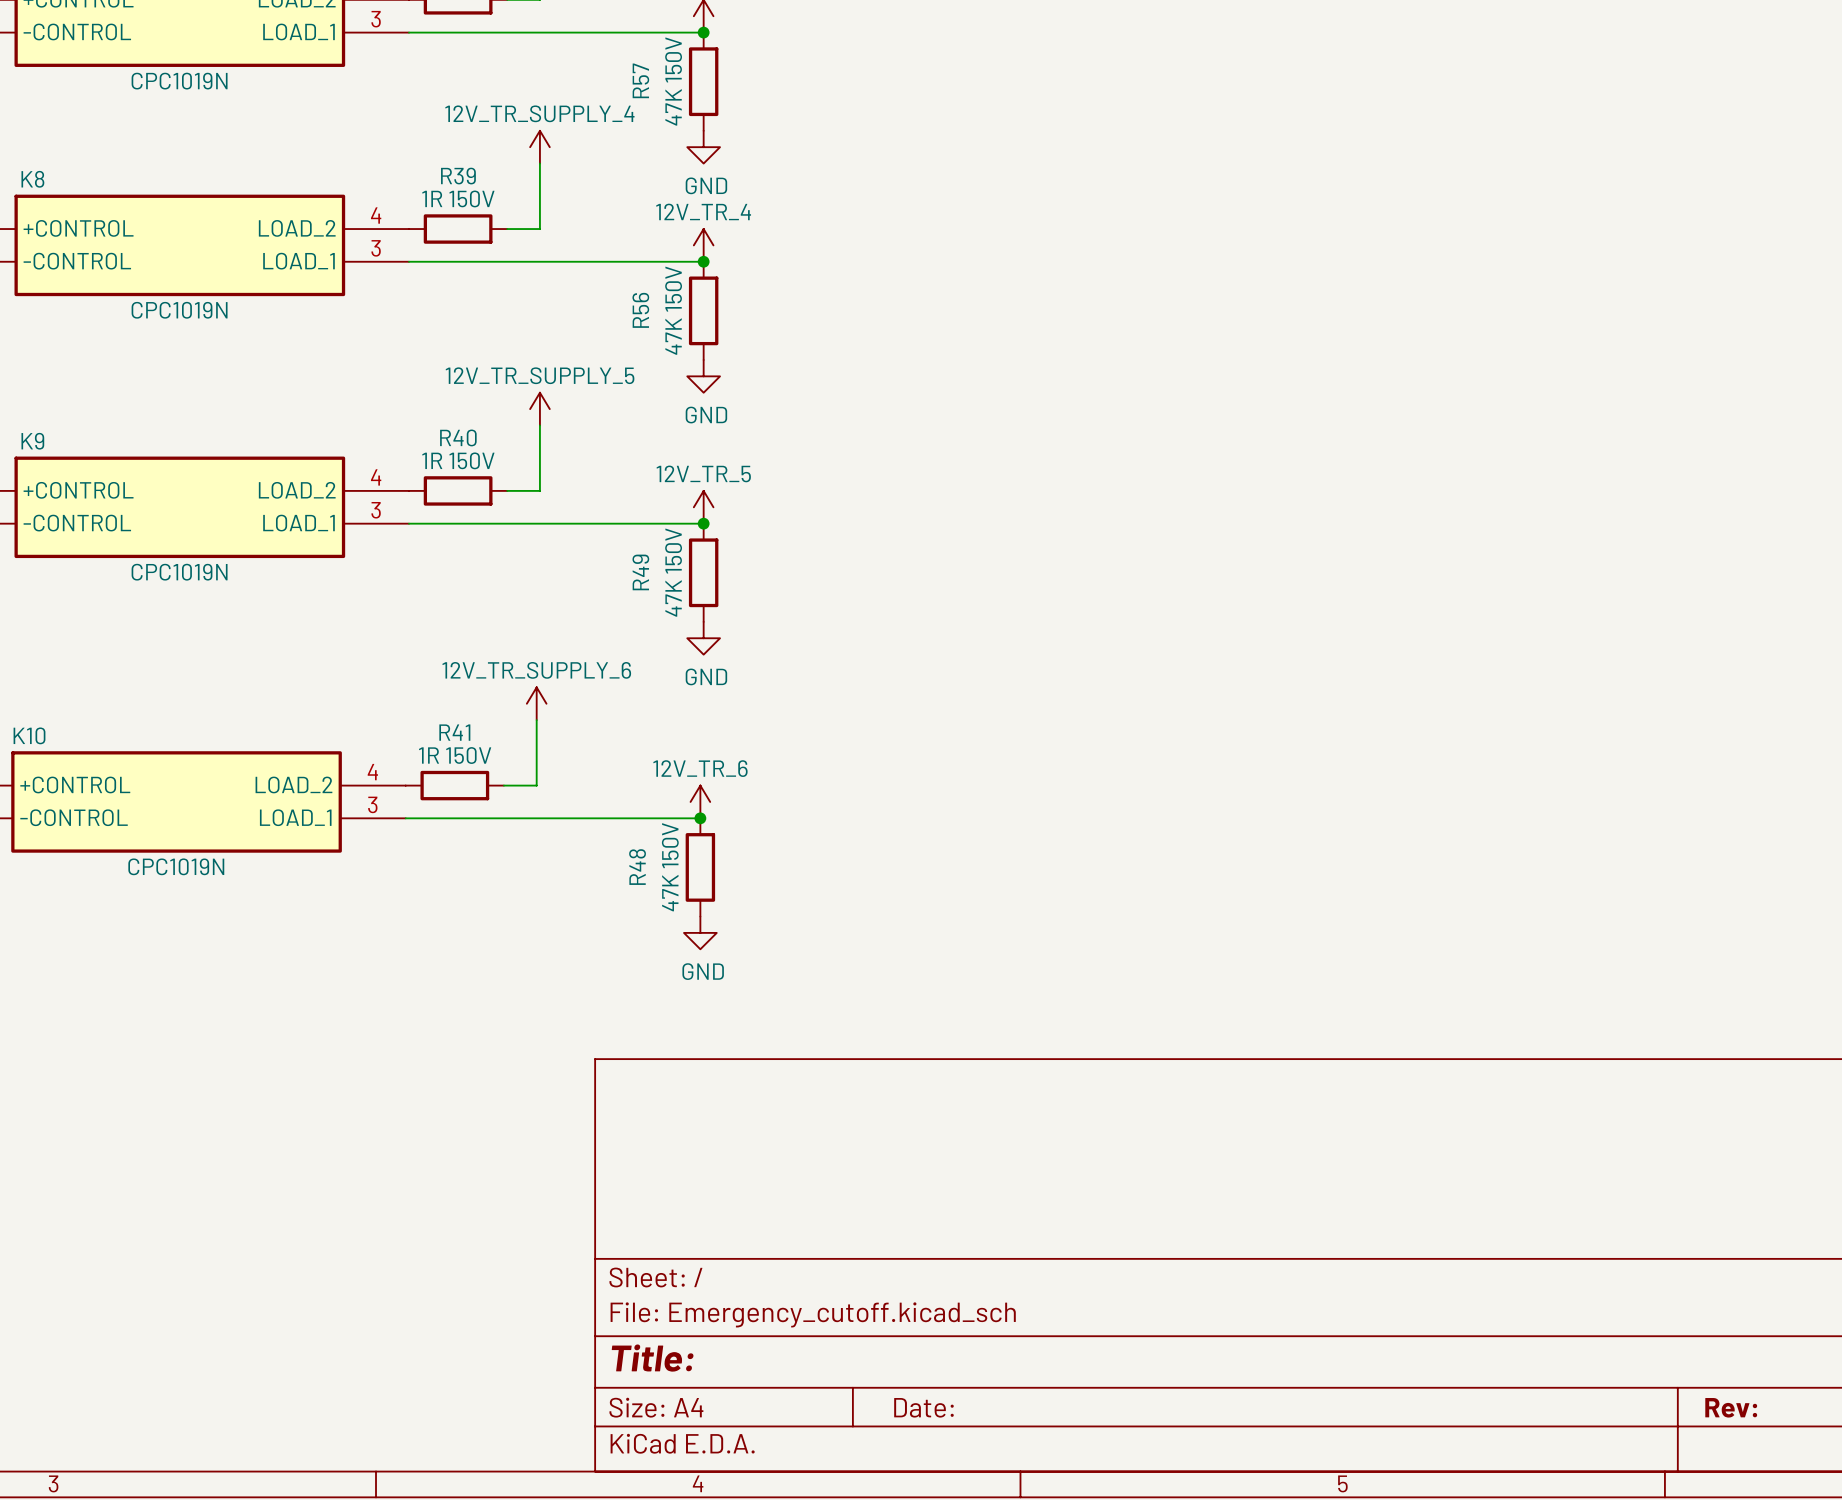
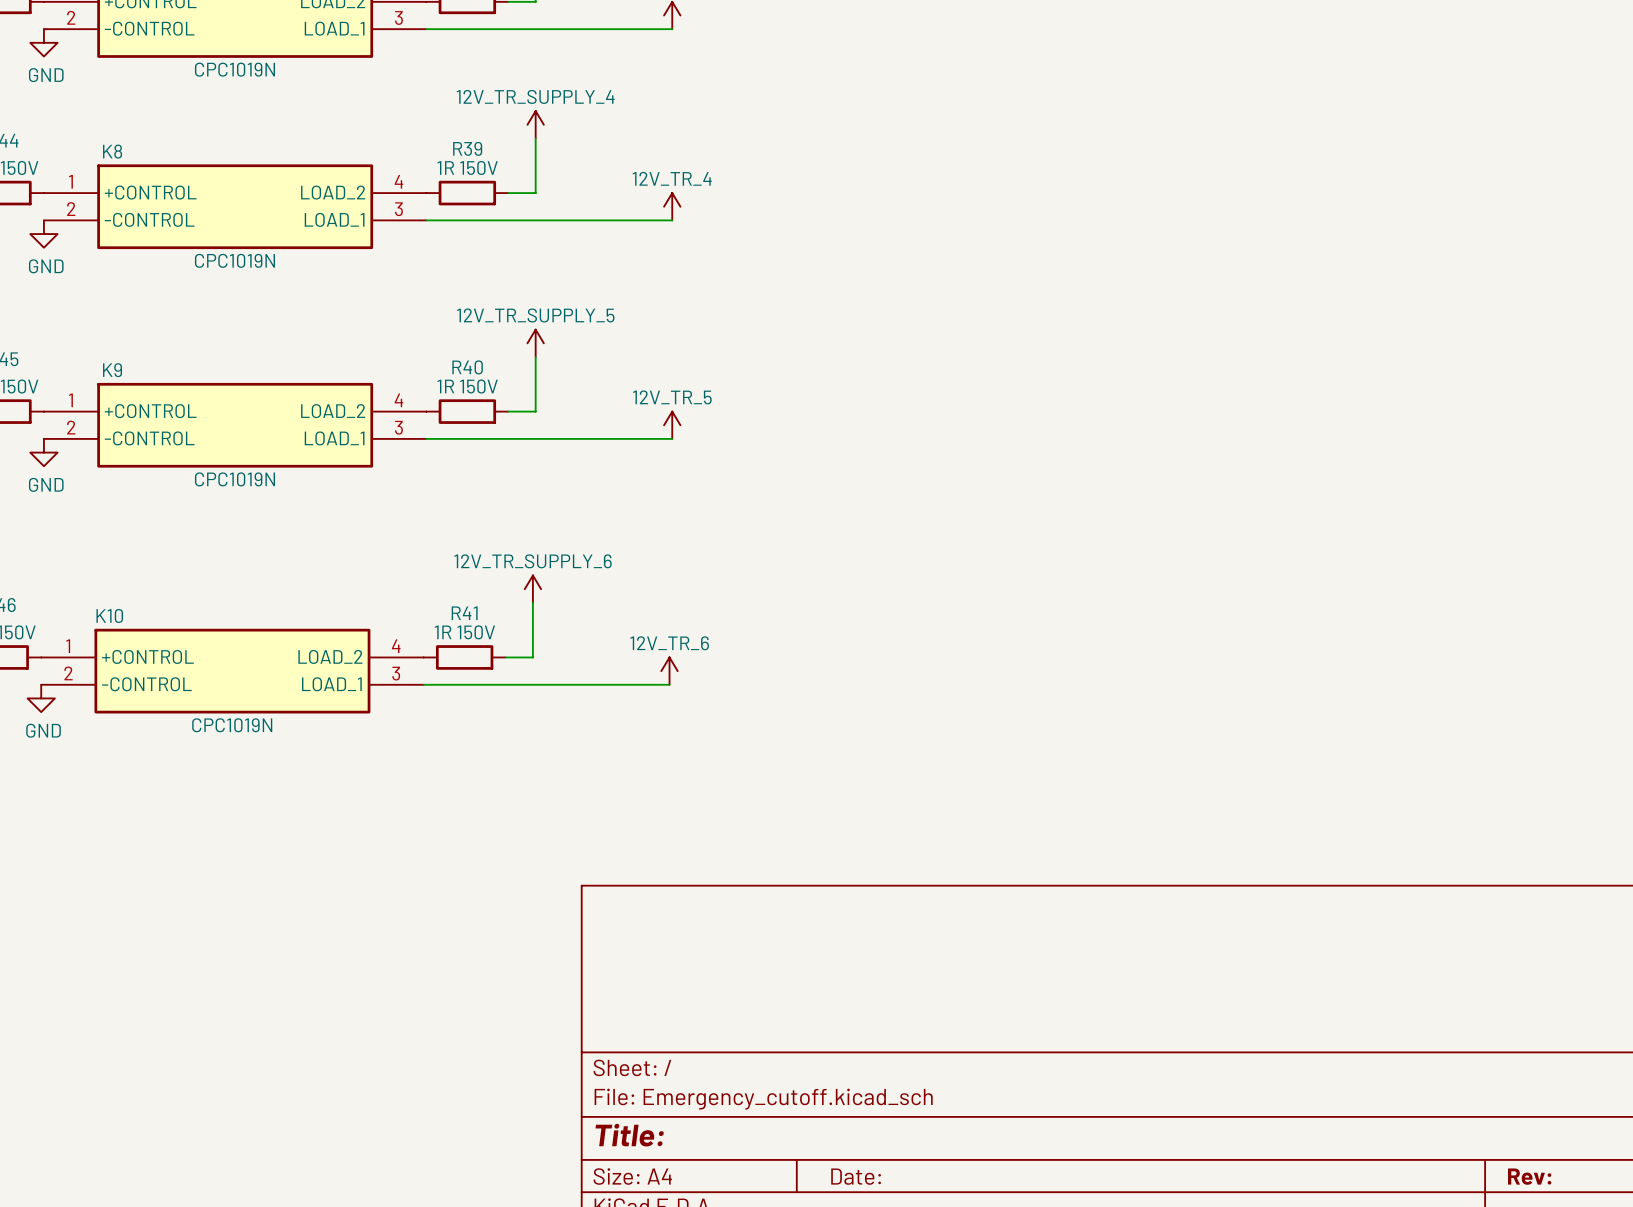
junction: (703, 32) -> none
R57: 47K 150V (703, 81) -> none
power symbol: GND (703, 147) -> none
junction: (703, 261) -> none
R56: 47K 150V (703, 310) -> none
power symbol: GND (703, 376) -> none
junction: (703, 523) -> none
R49: 47K 150V (703, 572) -> none
power symbol: GND (703, 638) -> none
junction: (700, 818) -> none
R48: 47K 150V (700, 867) -> none
power symbol: GND (700, 932) -> none

